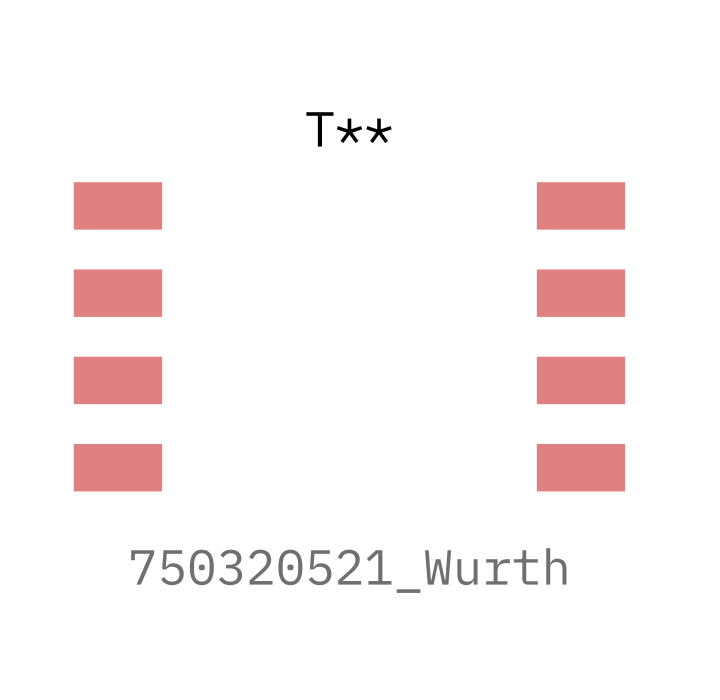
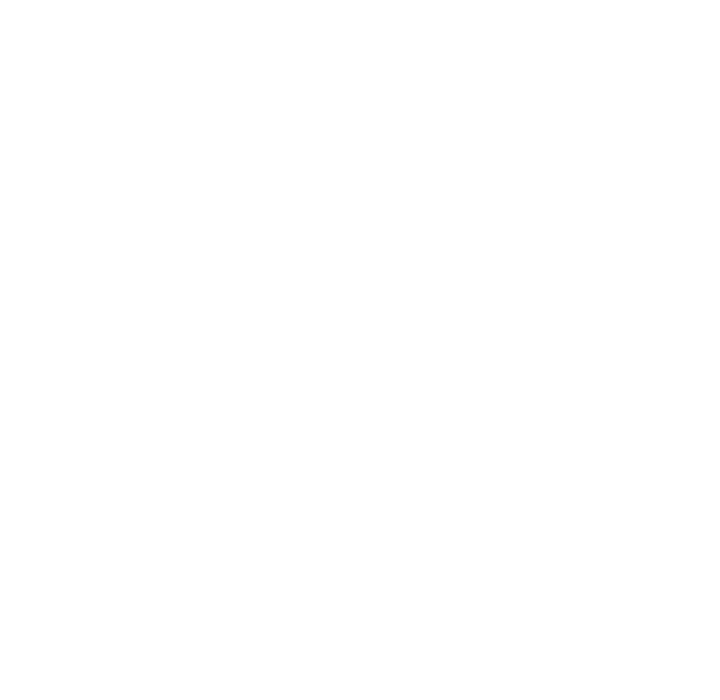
T**: 750320521_Wurth (349, 336) -> none

